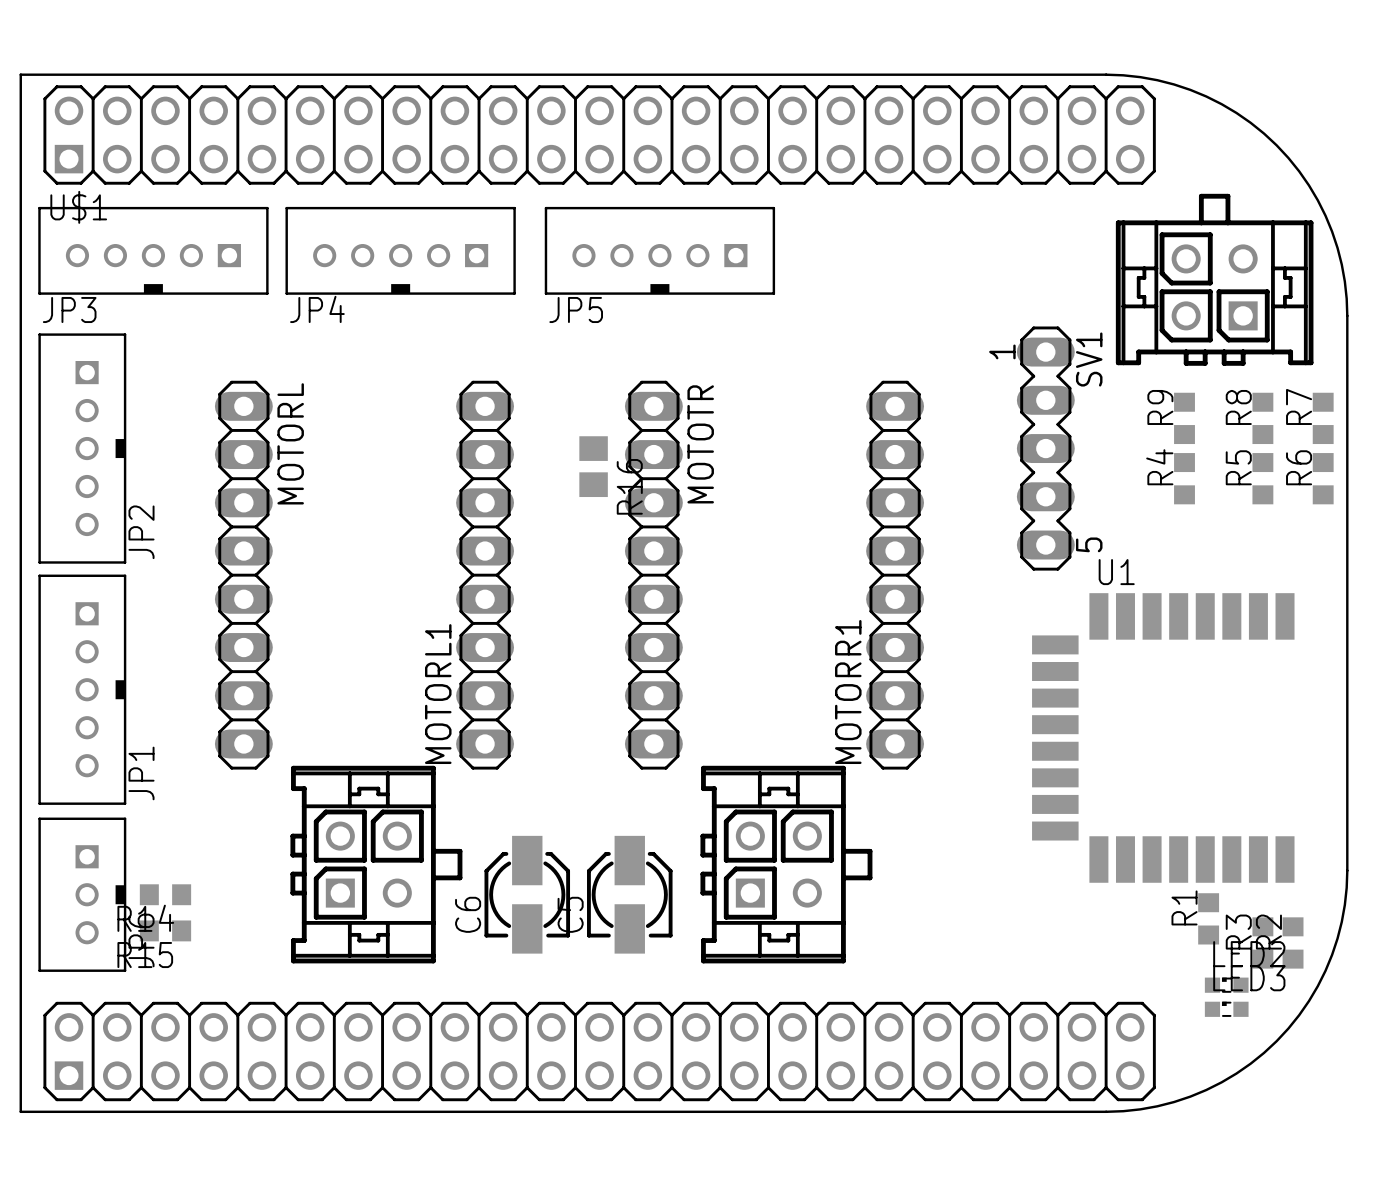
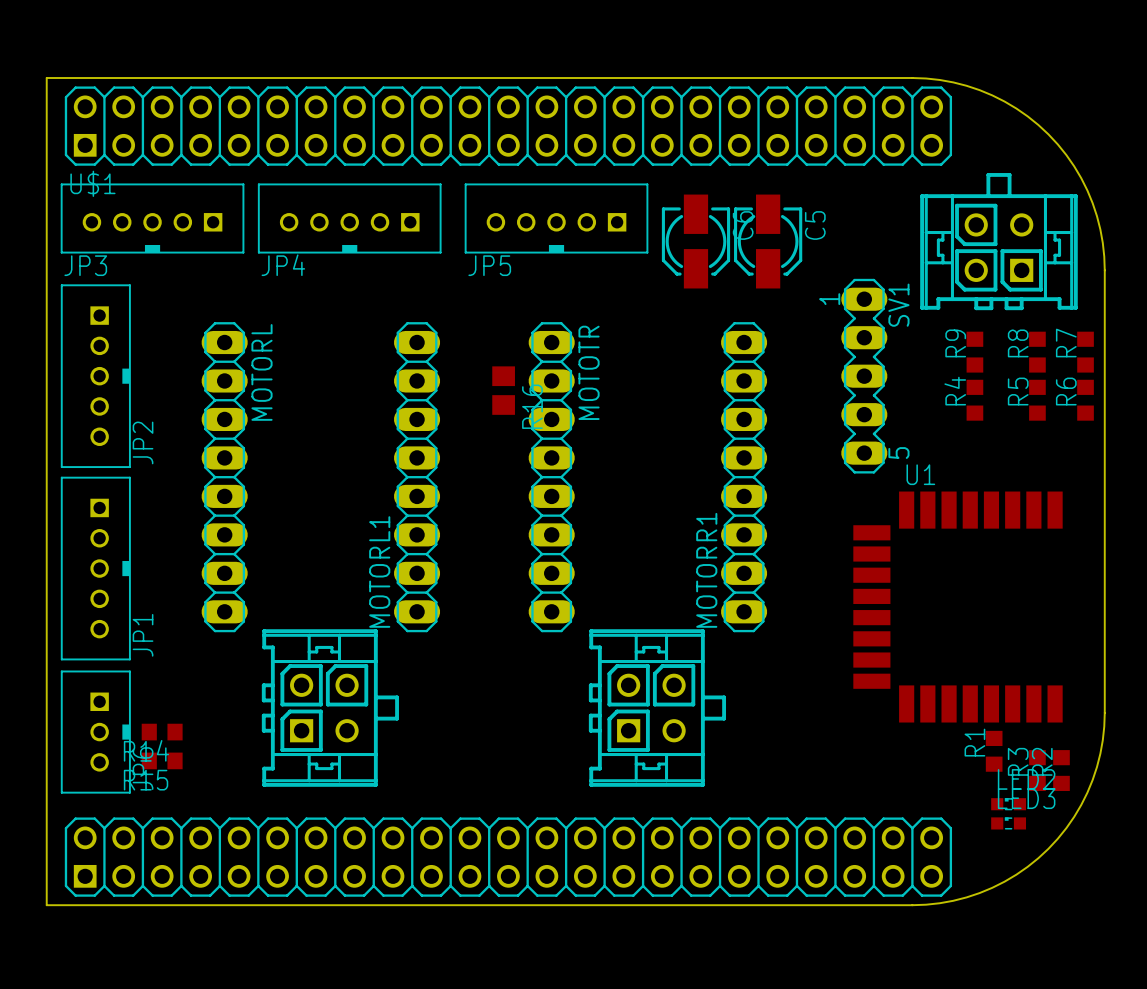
C6 rotation: 0° (527, 894) -> 180° (695, 241)
C6 position: (527, 894) -> (695, 241)
C5 rotation: 0° (629, 894) -> 180° (768, 241)
C5 position: (629, 894) -> (768, 241)

